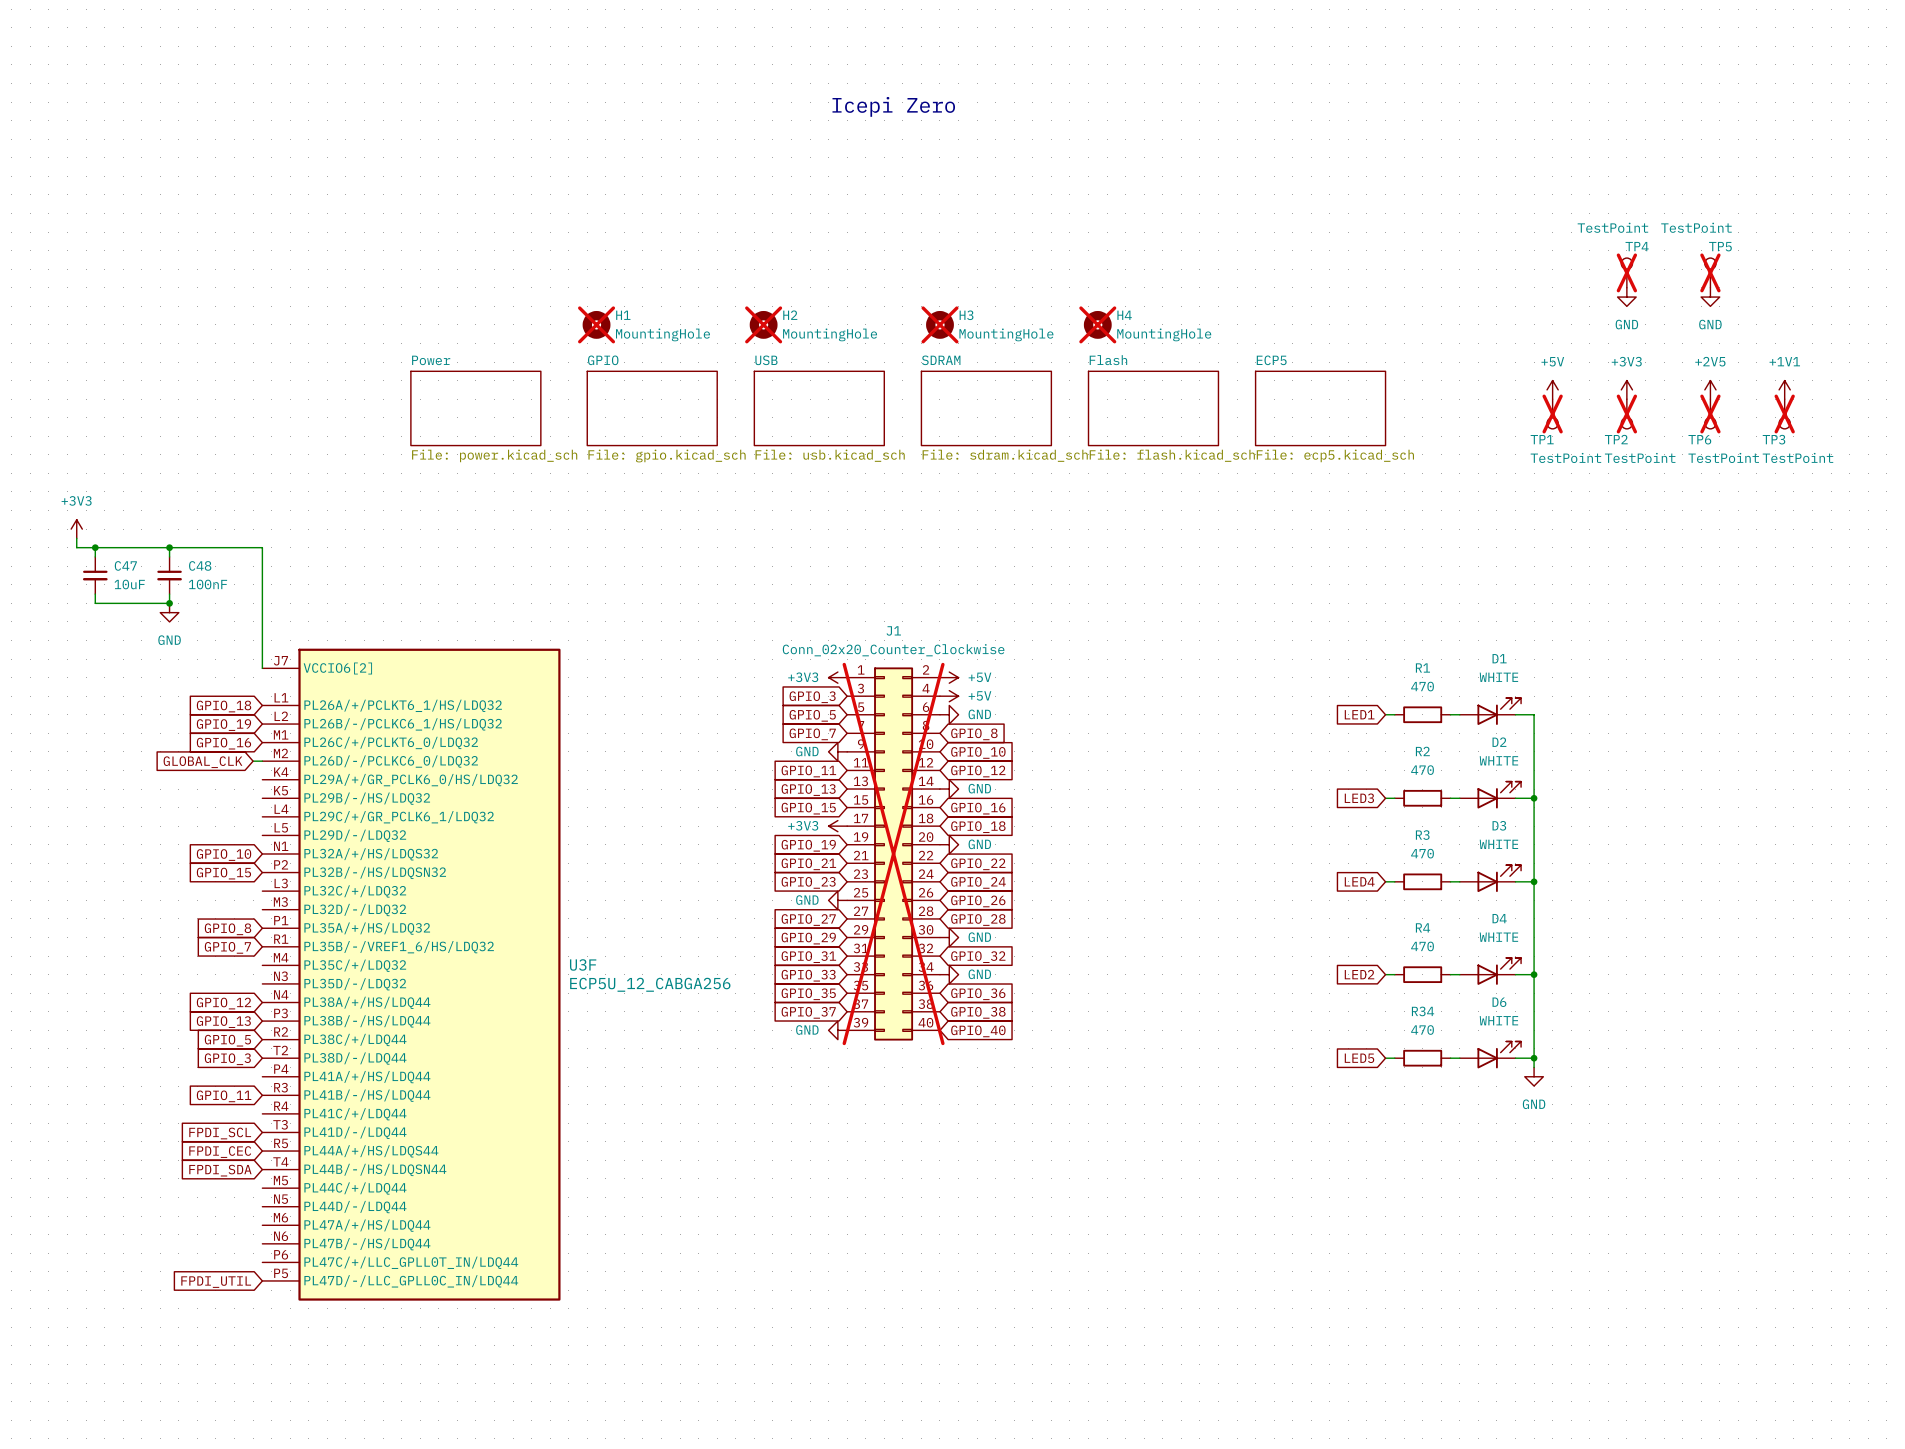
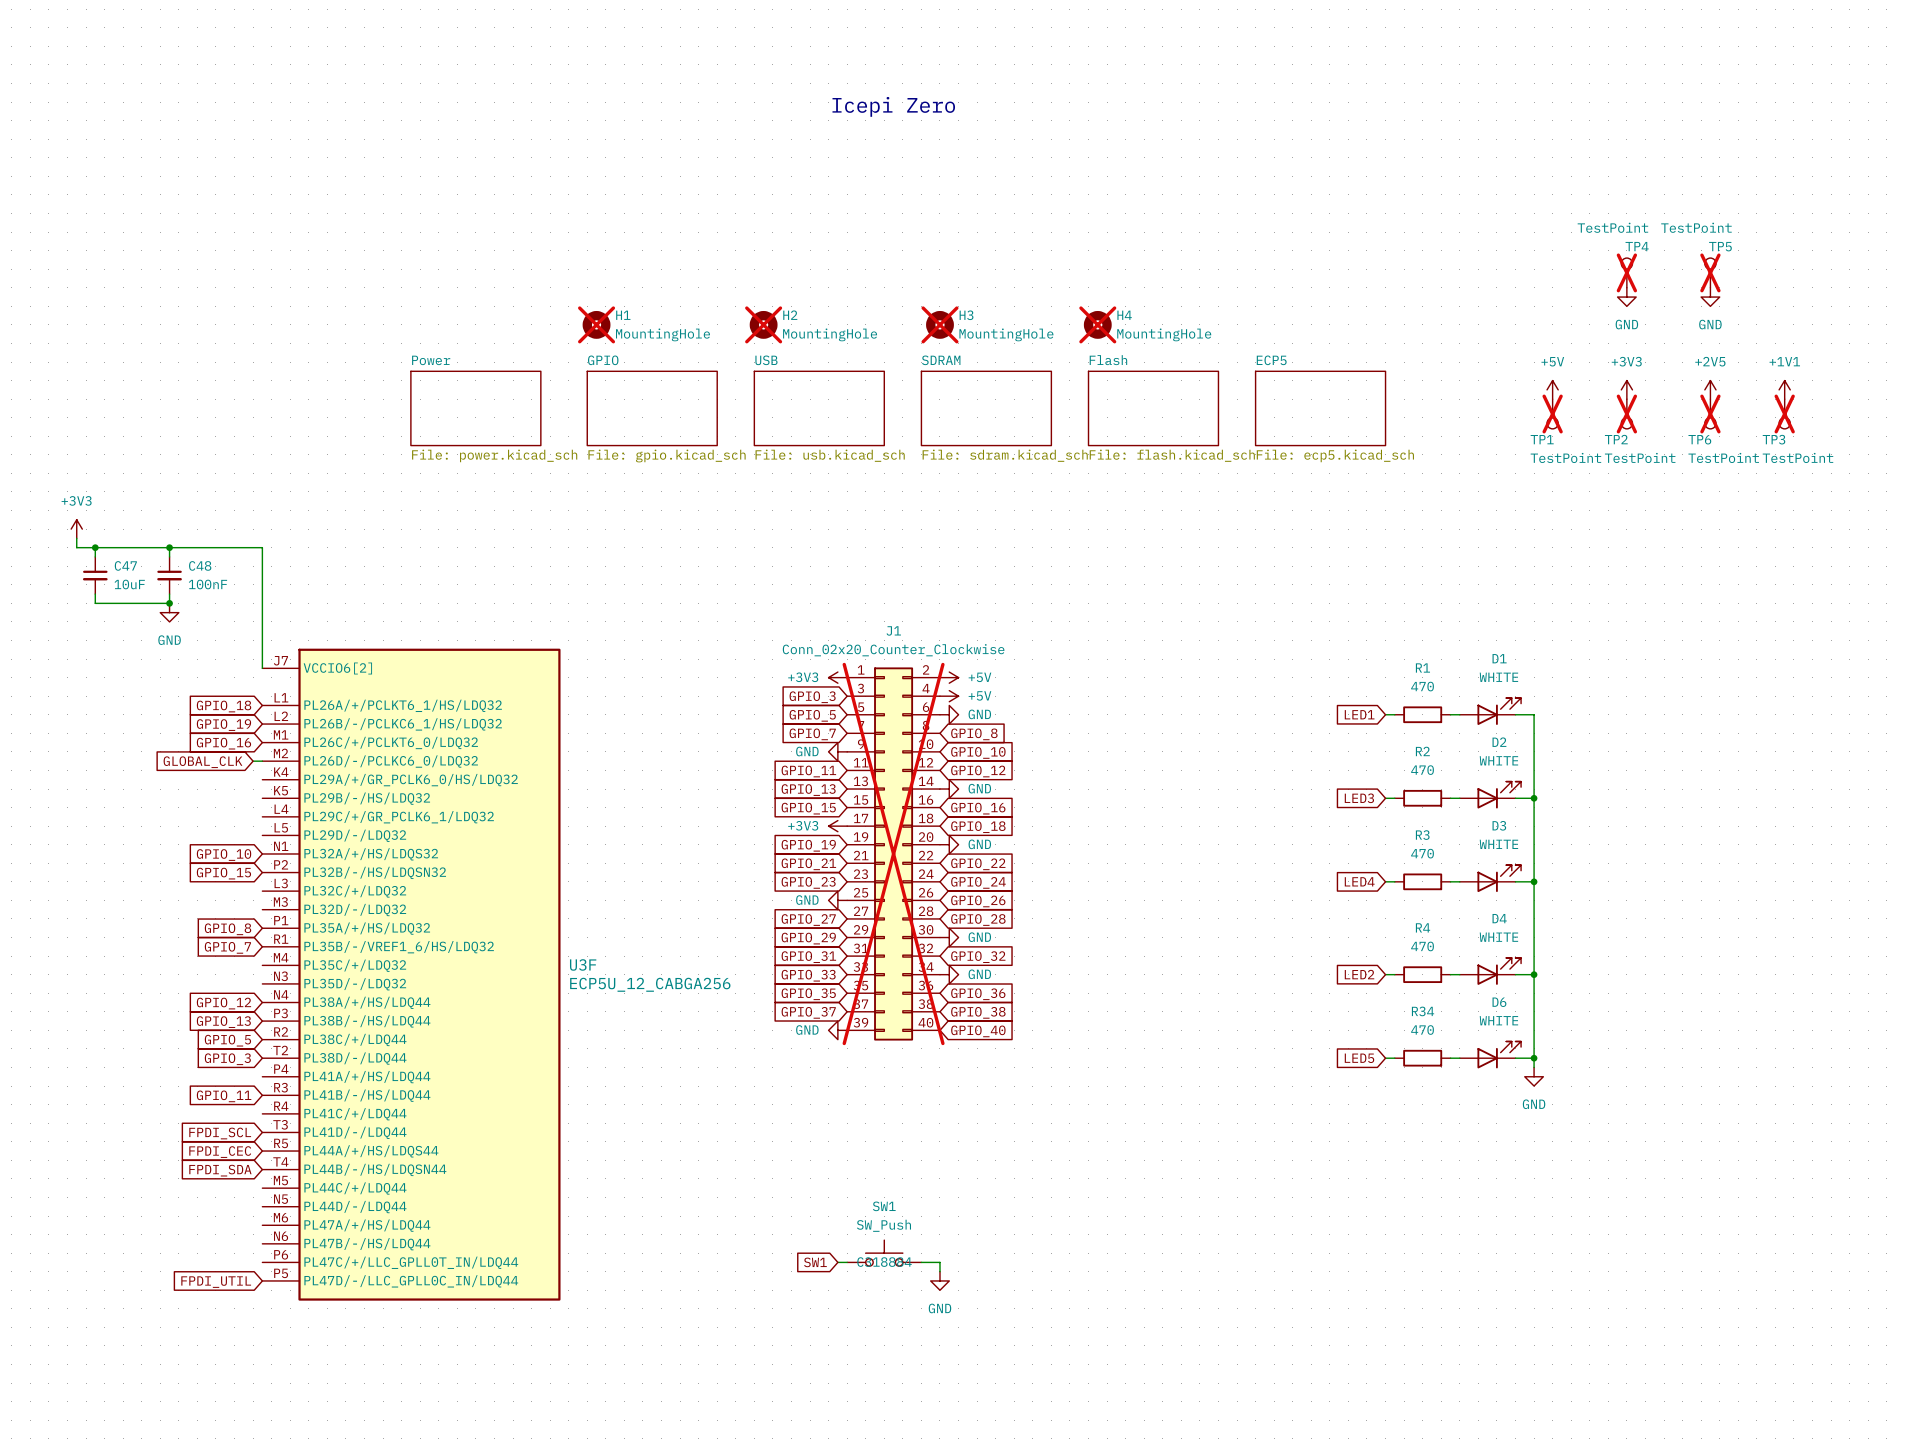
SW1: none -> SW_Push (884, 1253)
global label: none -> SW1 (815, 1262)
wire: none -> (837, 1262) (847, 1262)
wire: none -> (921, 1262) (939, 1262) (939, 1271)
power symbol: none -> GND (939, 1280)

